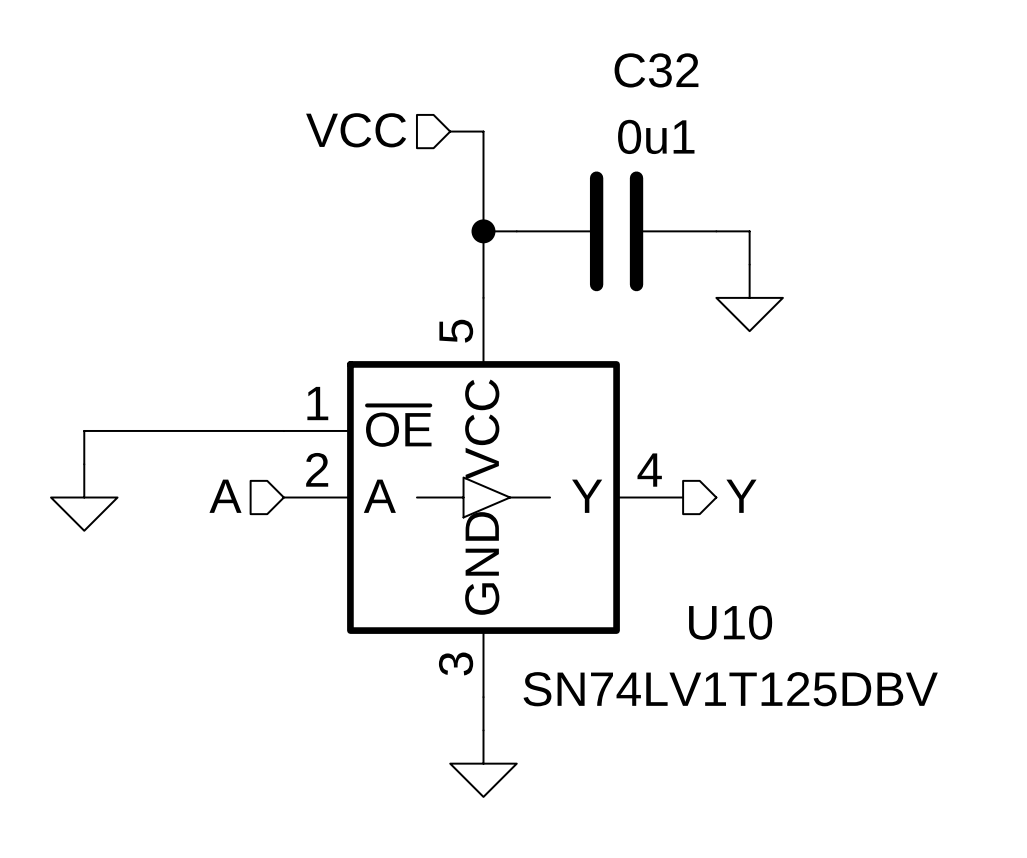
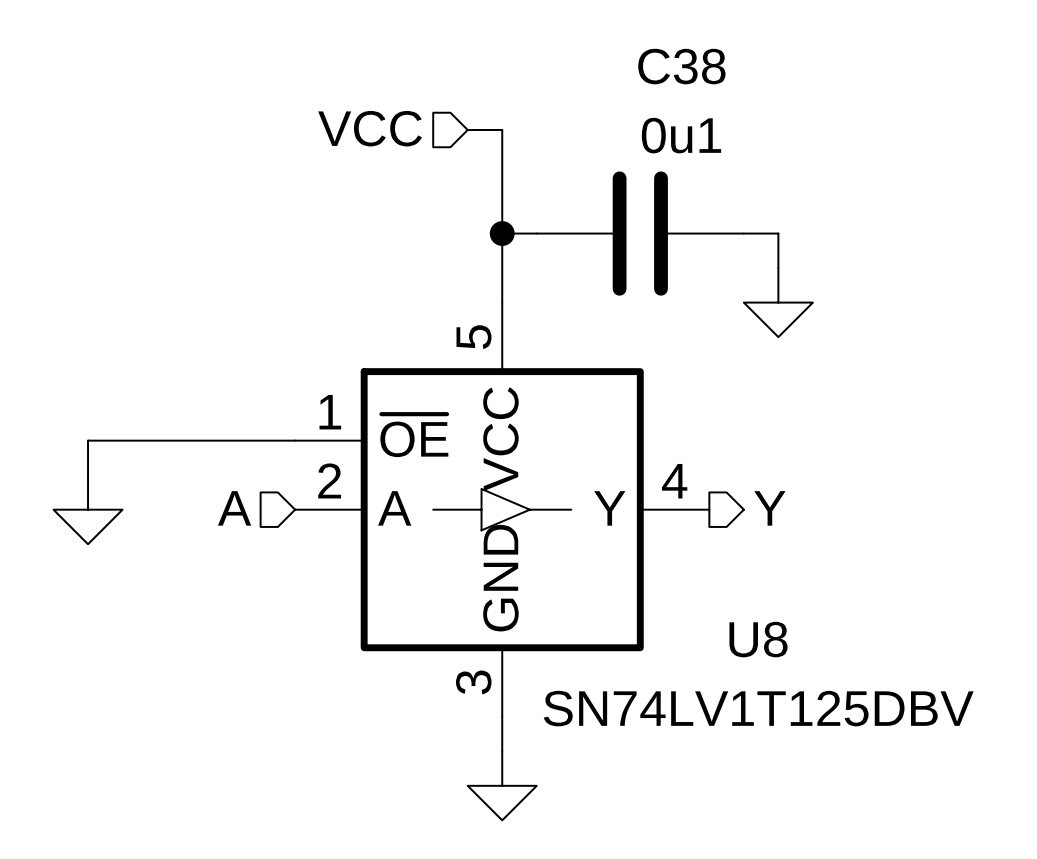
C32 name: C32 (656, 70) -> C38 (681, 66)
U10 name: U10 (730, 622) -> U8 (758, 639)

